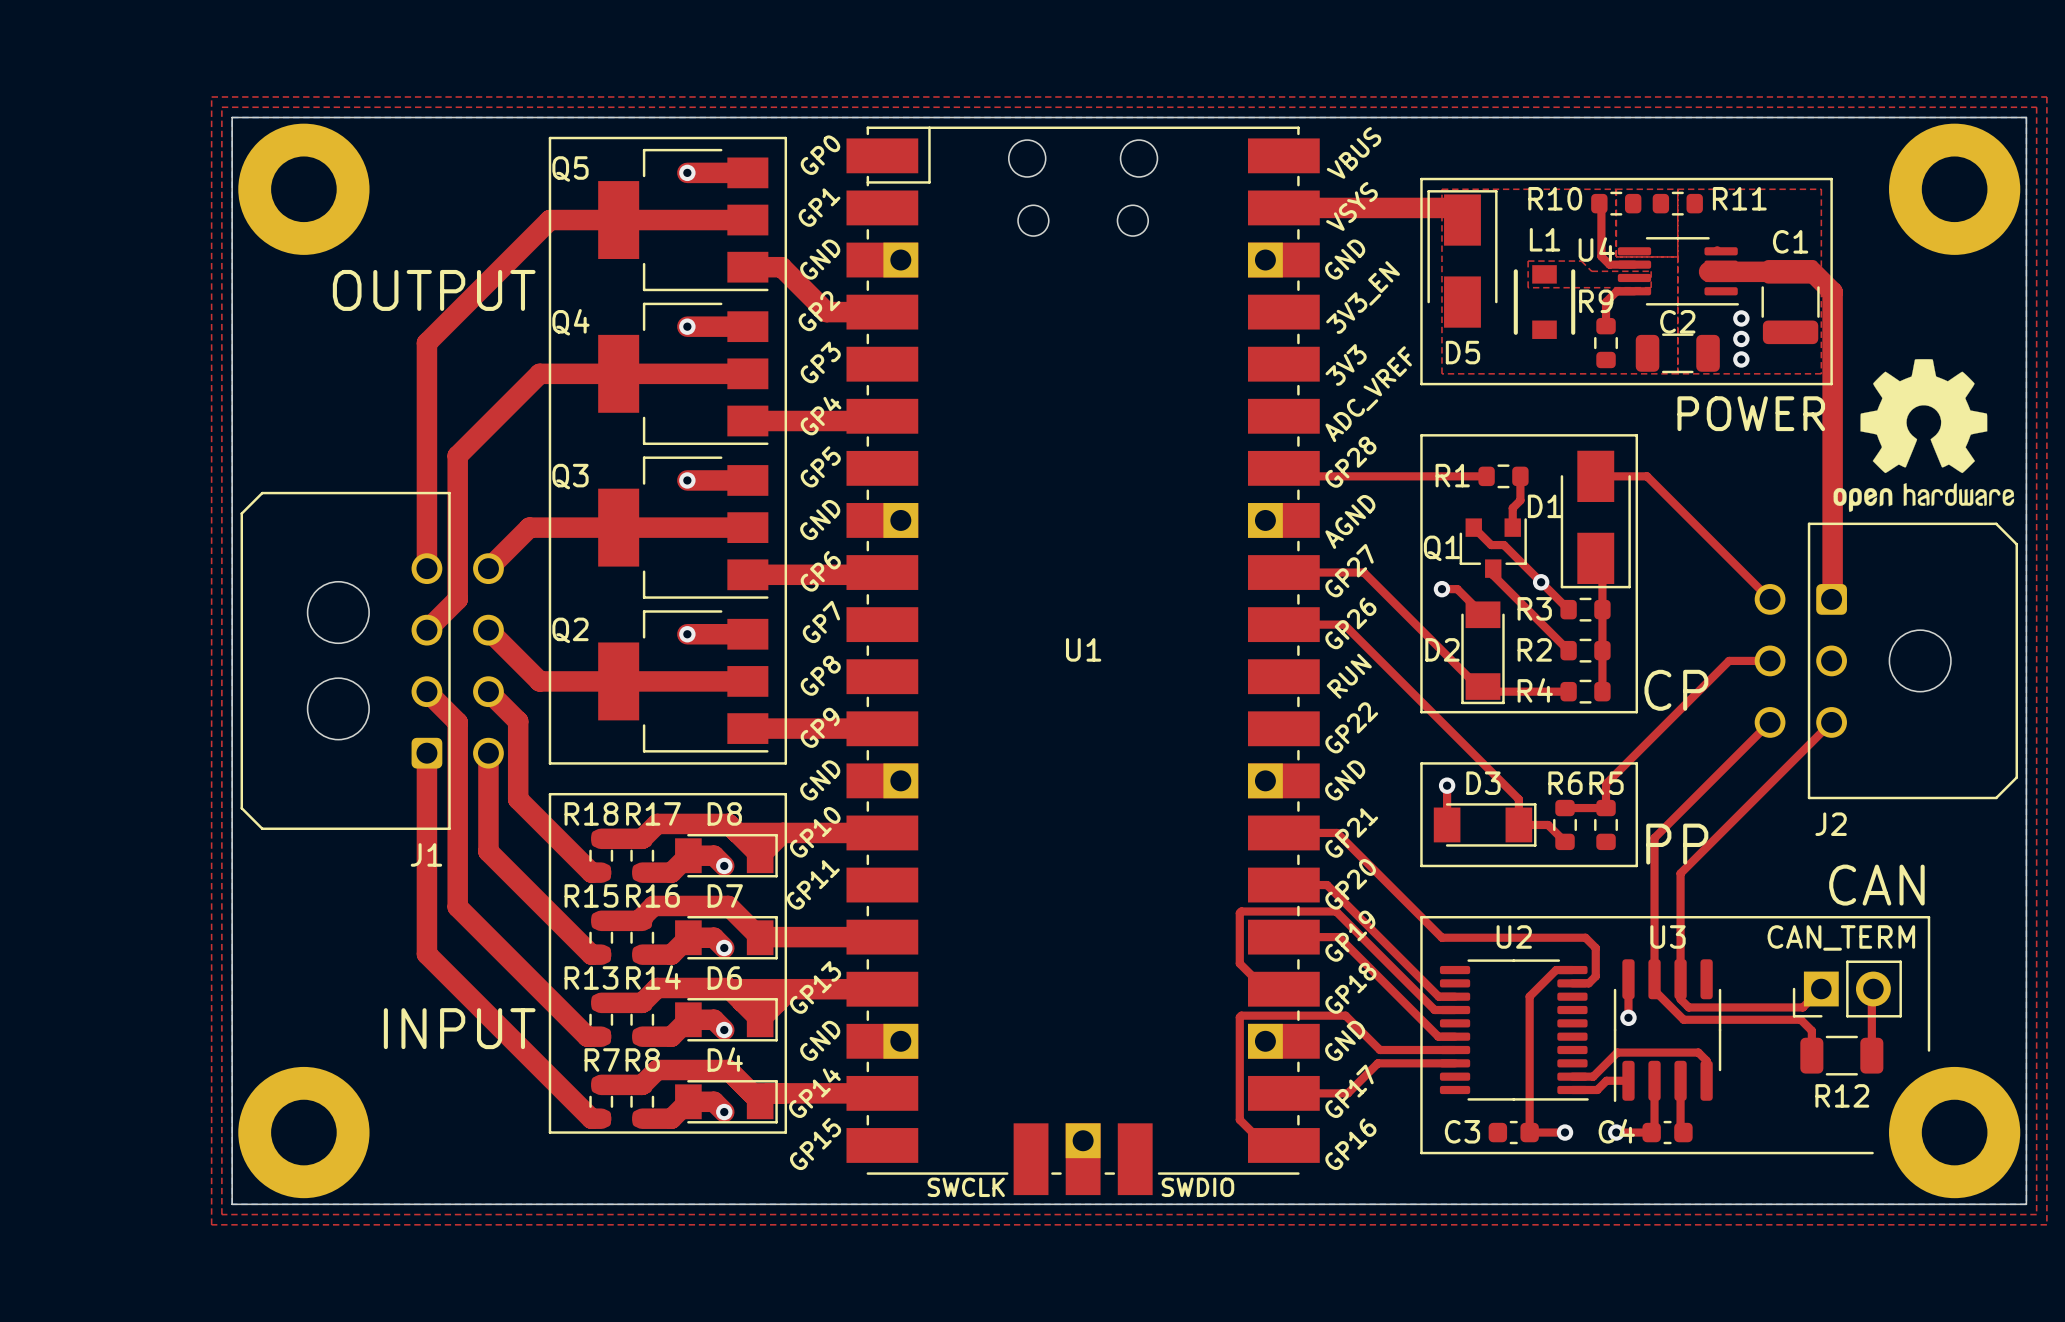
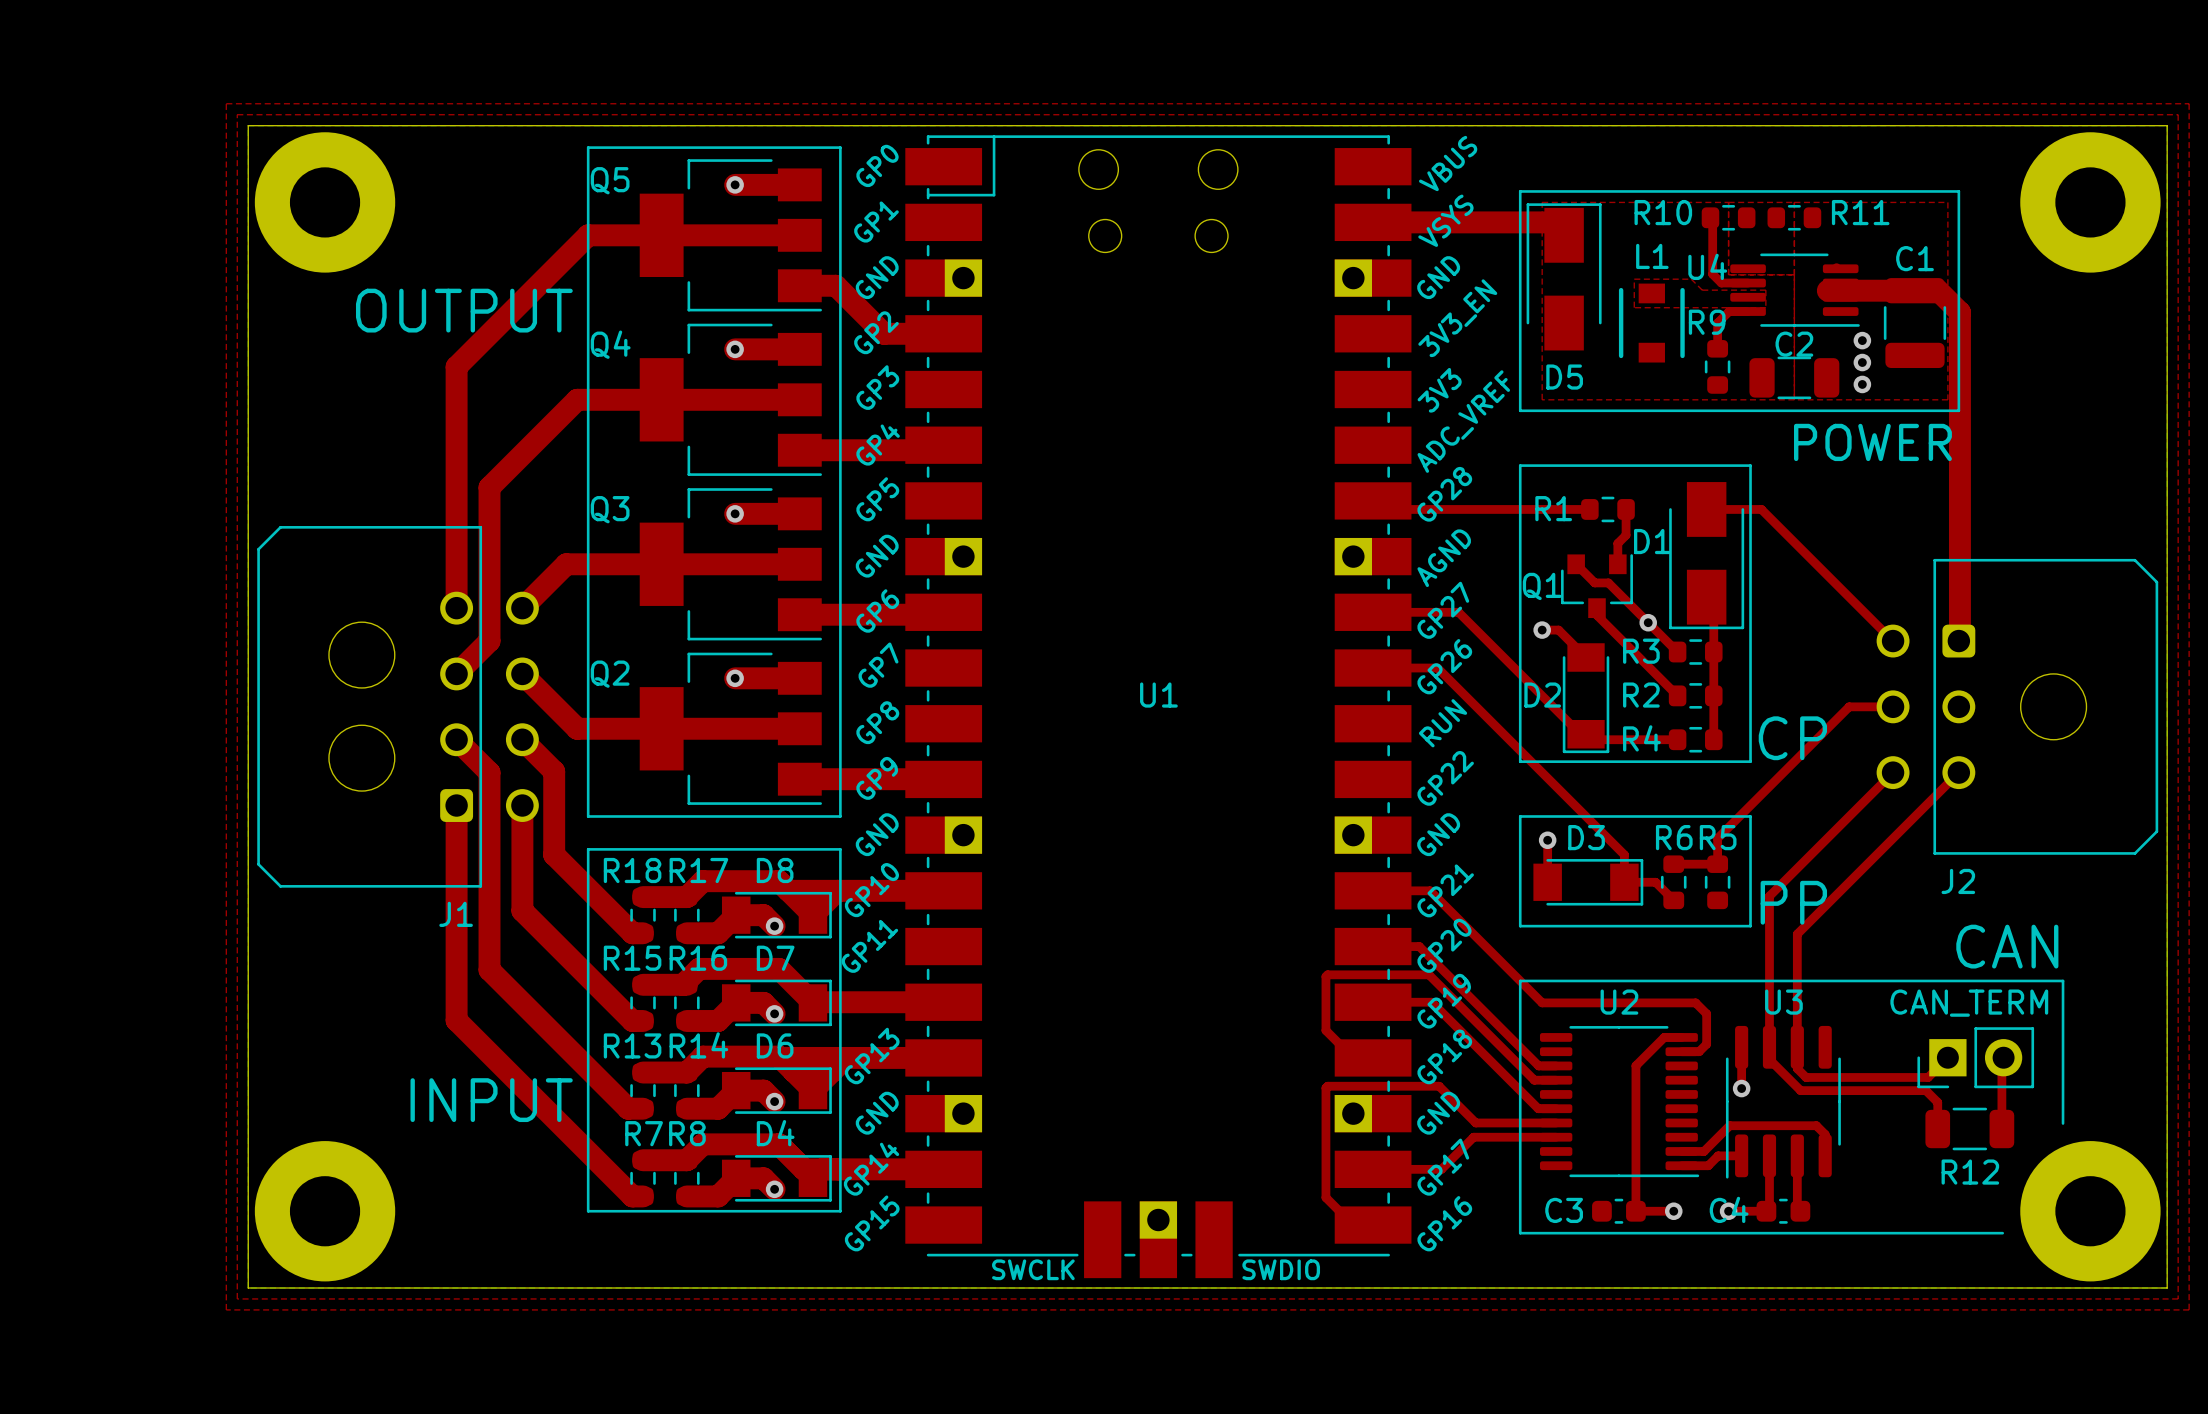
drawing: [1833, 359, 2015, 512] -> none

